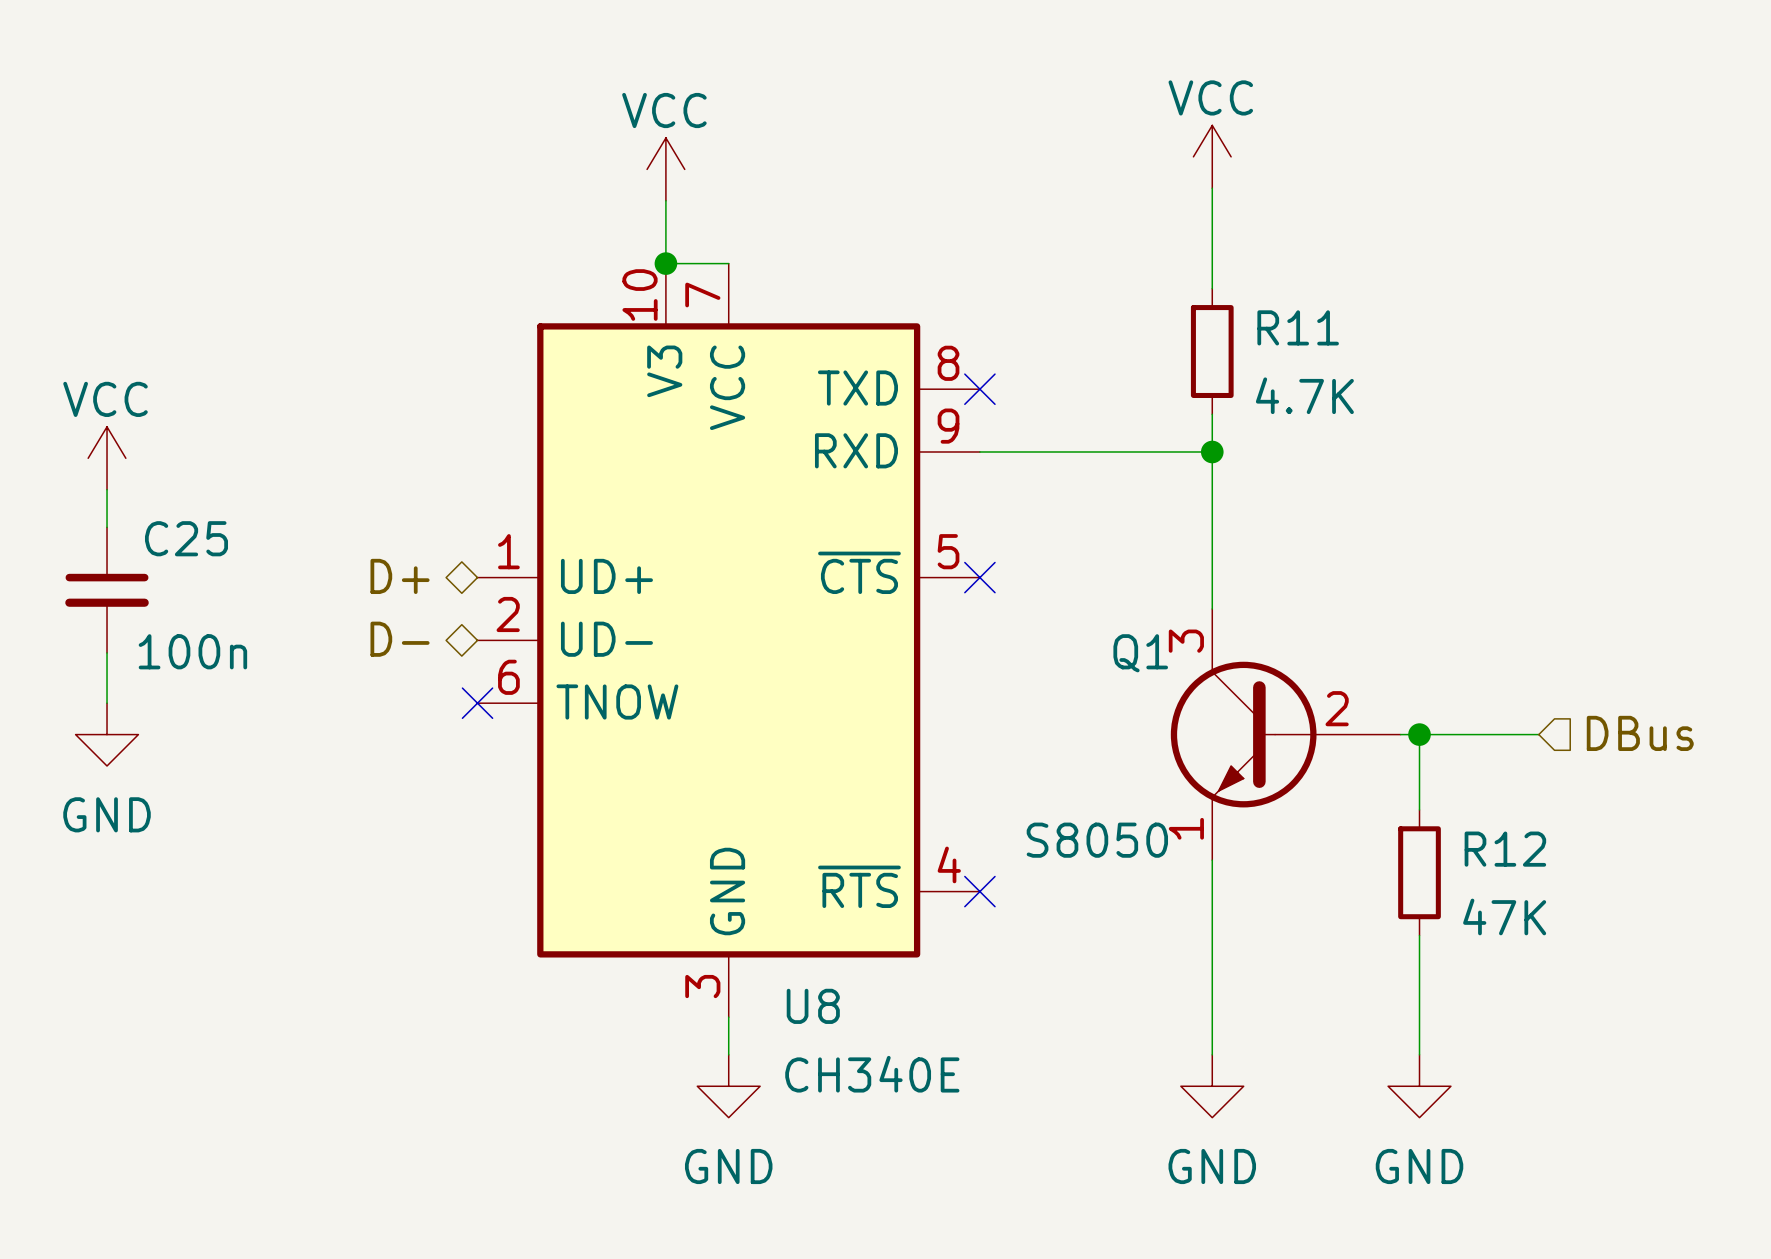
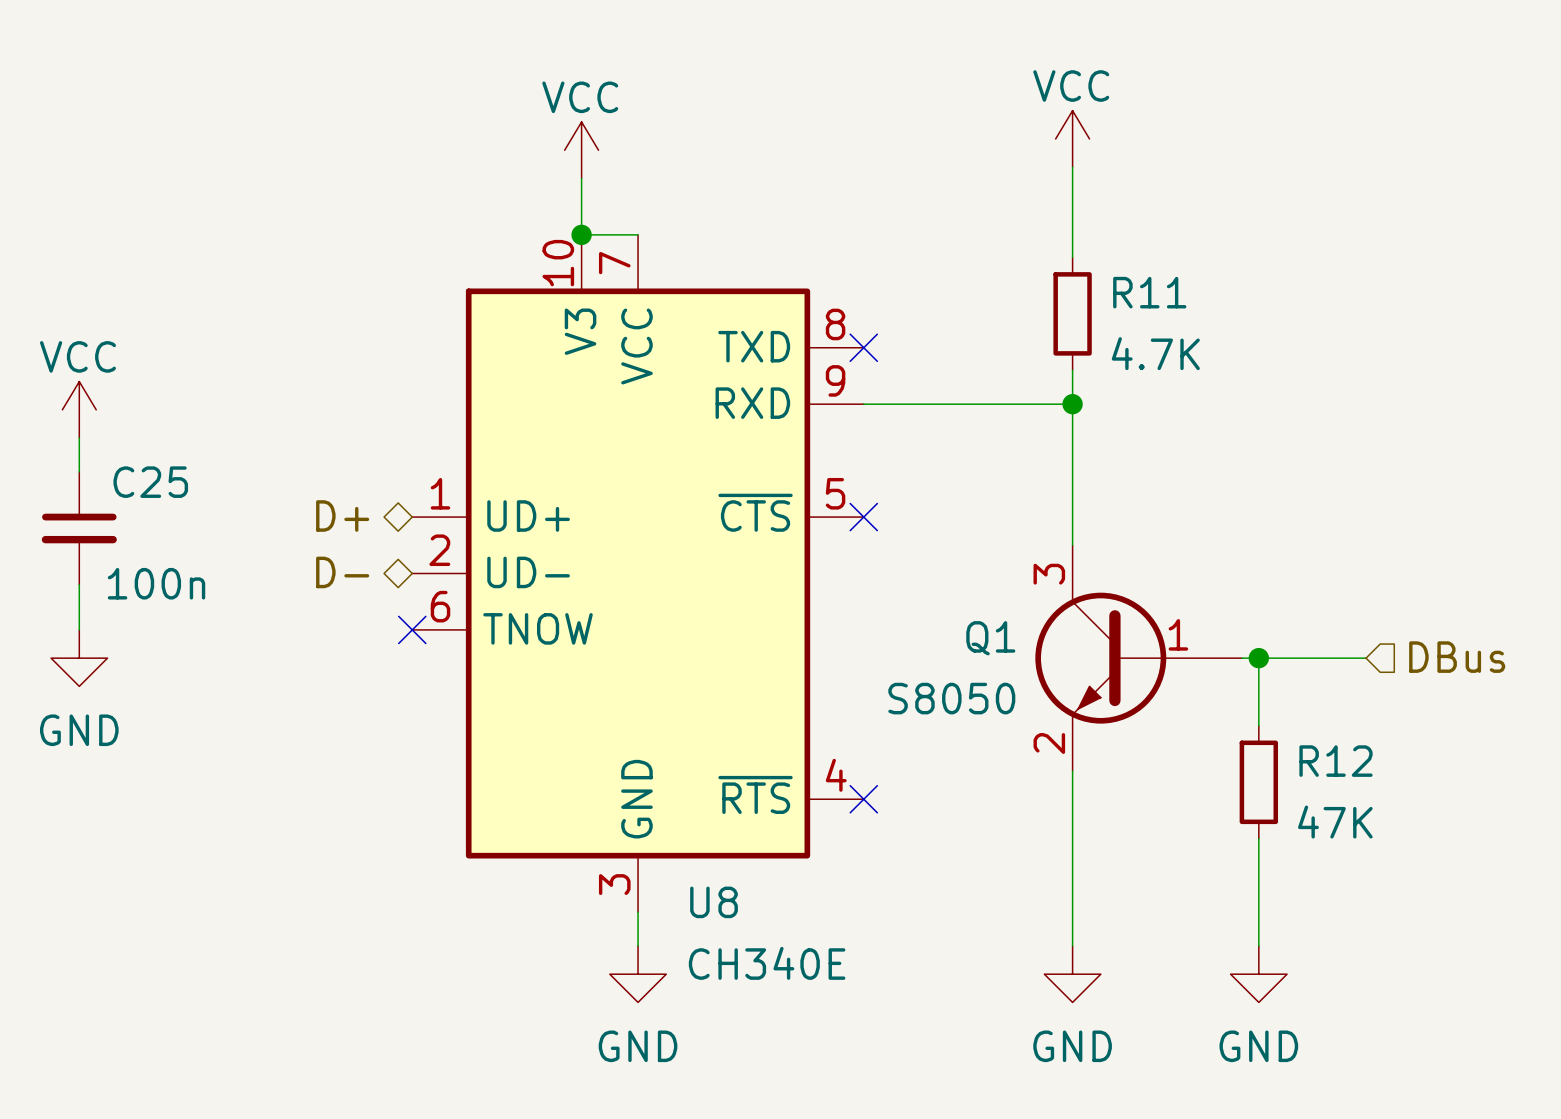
Q1 symbol: [1170, 608, 1401, 861] -> [1035, 545, 1242, 772]
Q1 name position: Q1 (1140, 653) -> Q1 (990, 638)
Q1 value position: S8050 (1097, 840) -> S8050 (951, 698)

